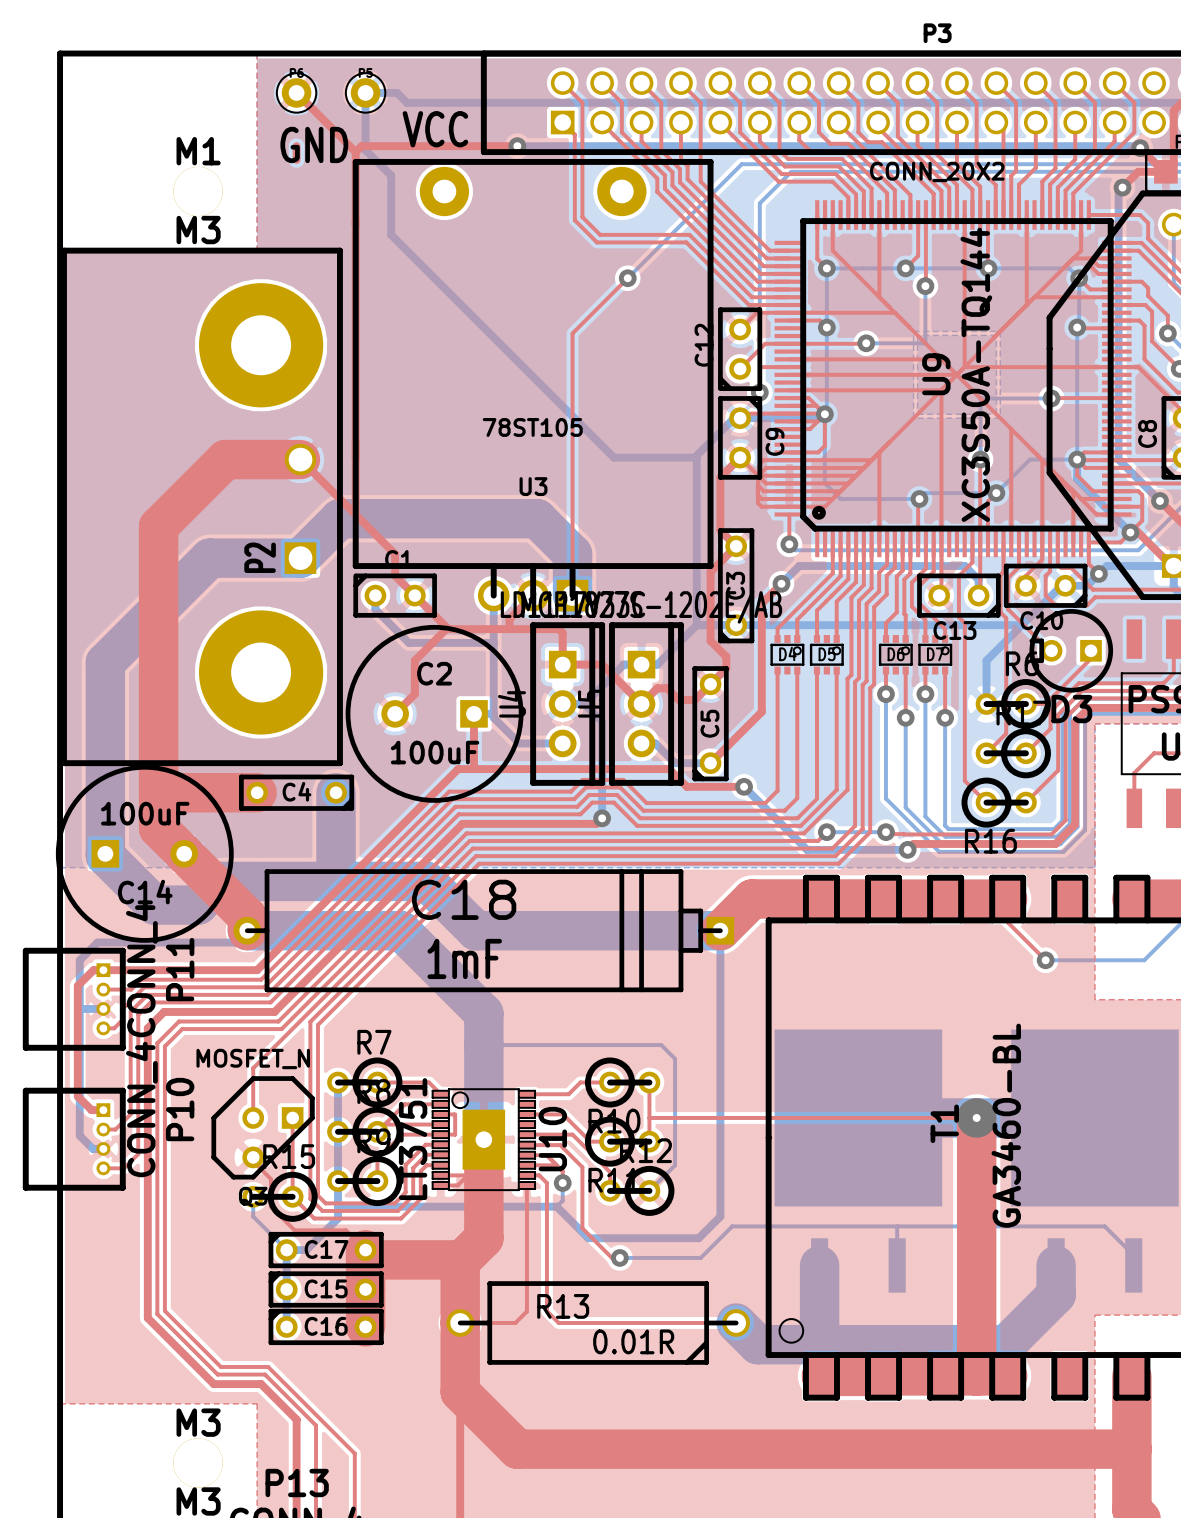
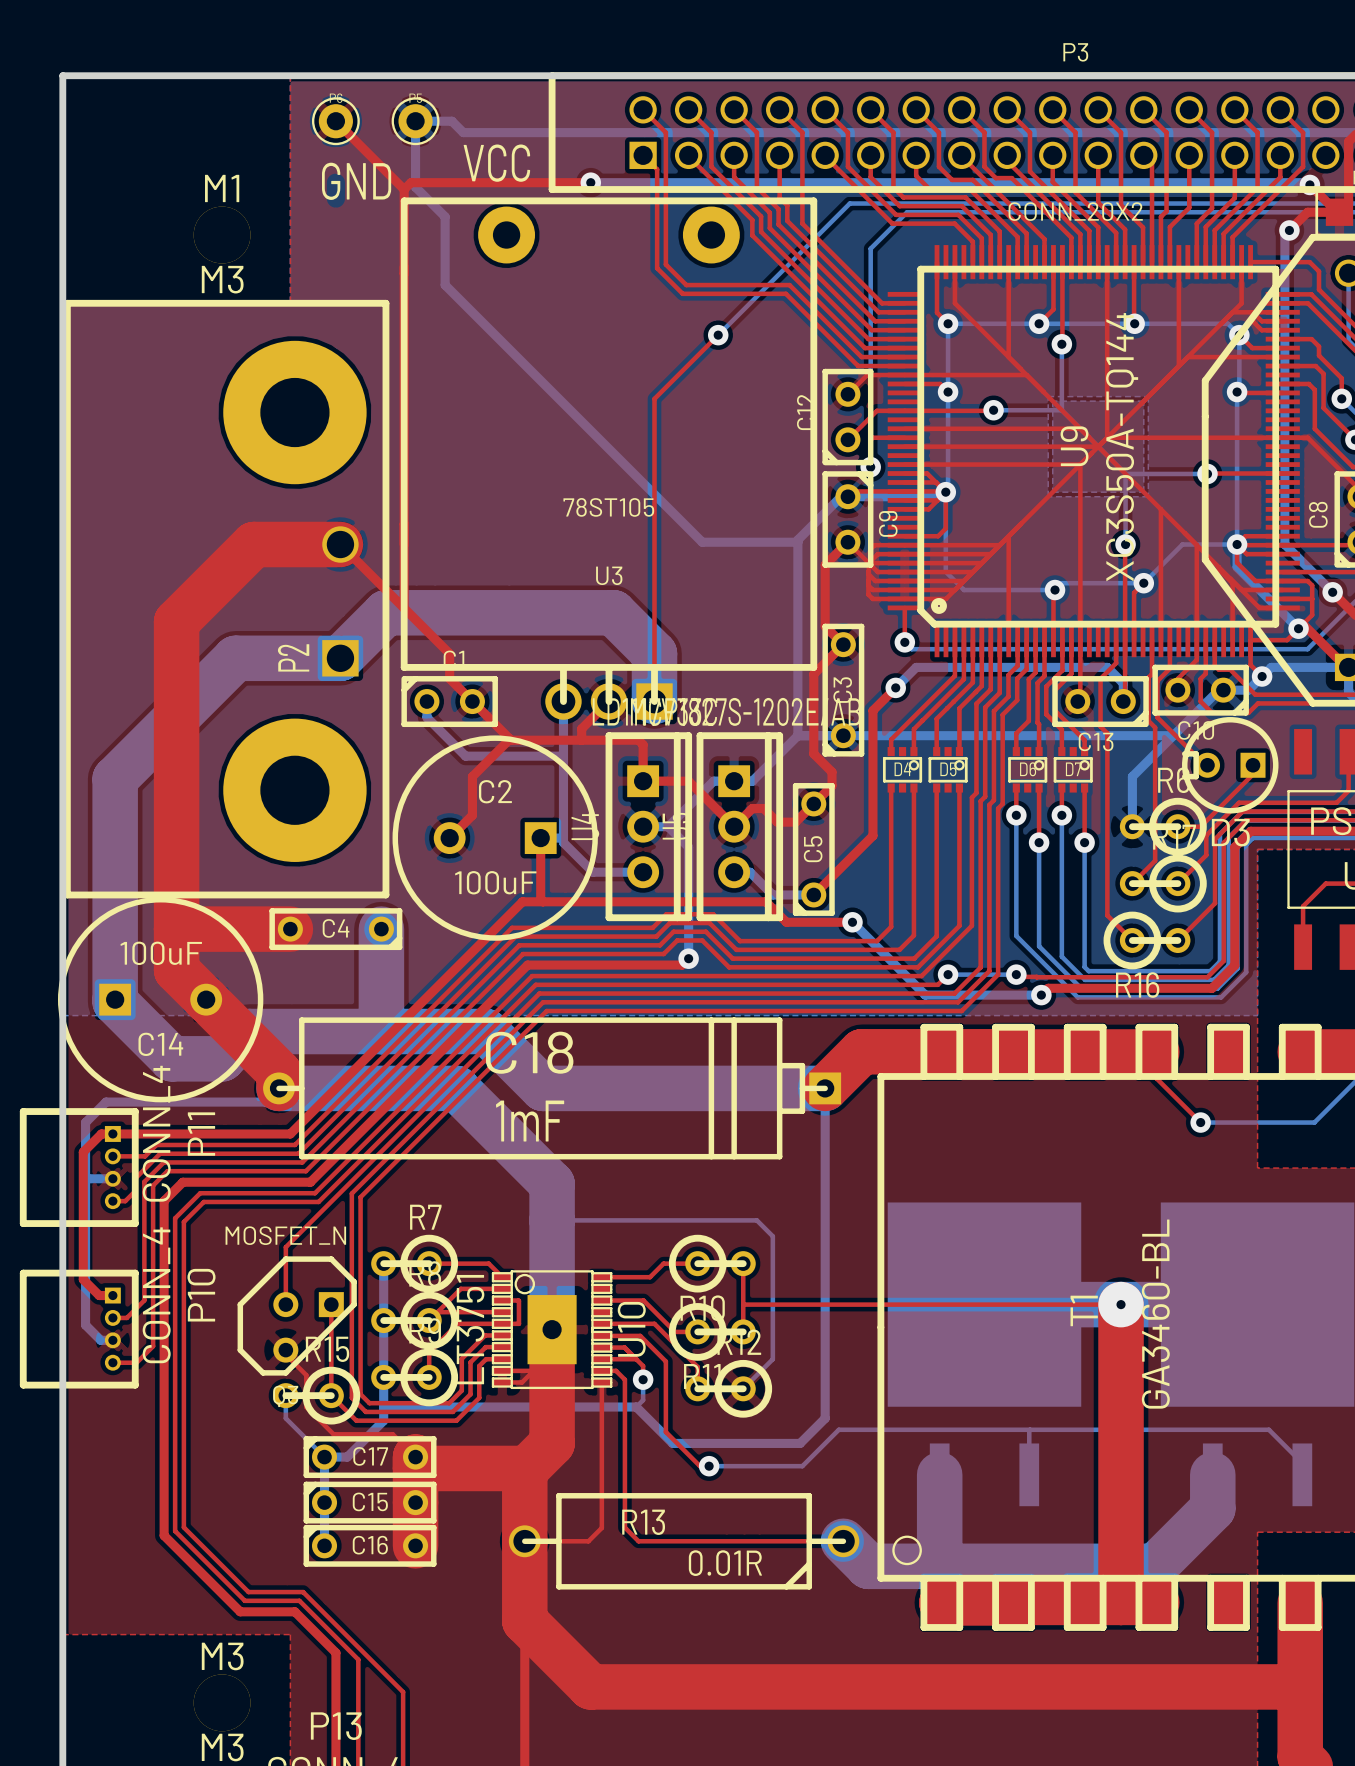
top track: (296, 146) (296, 159) -> none

